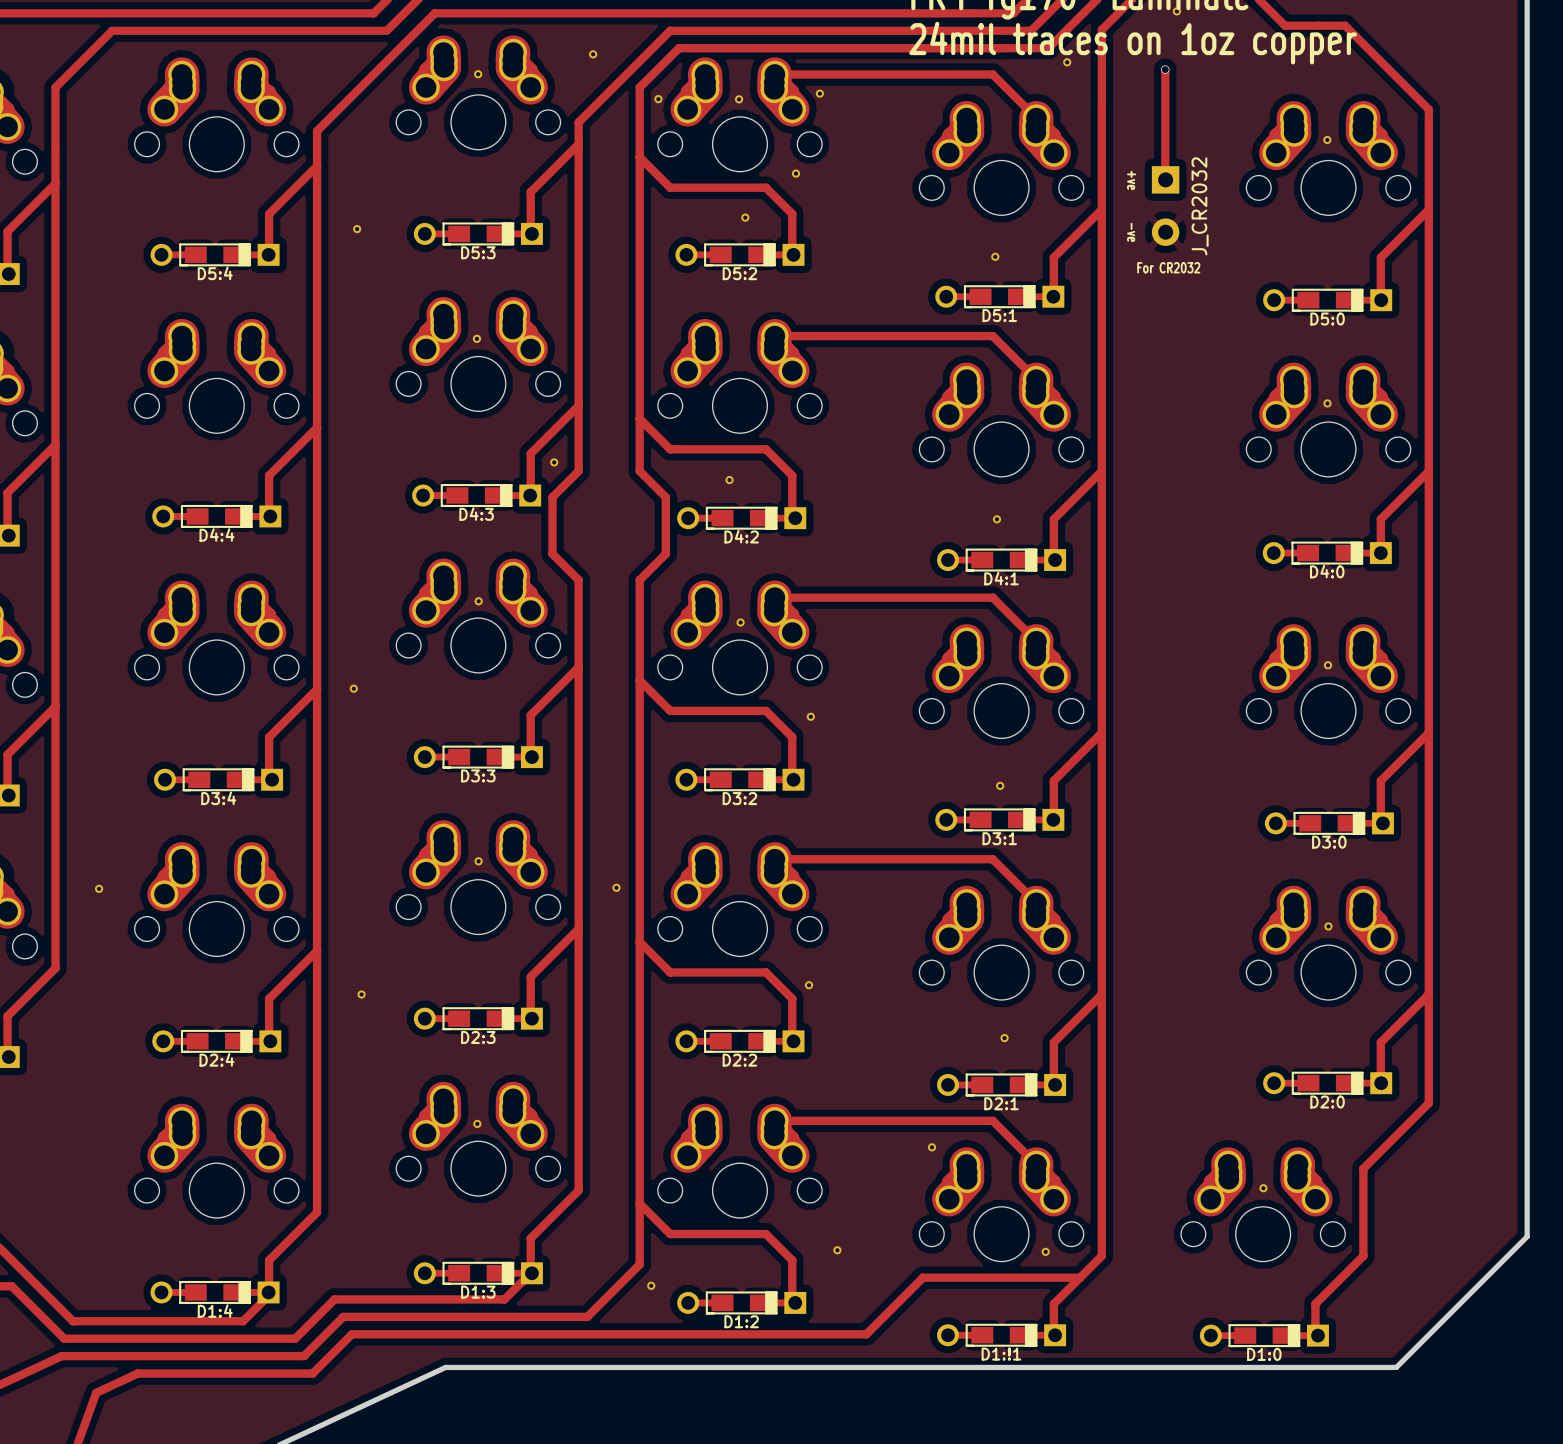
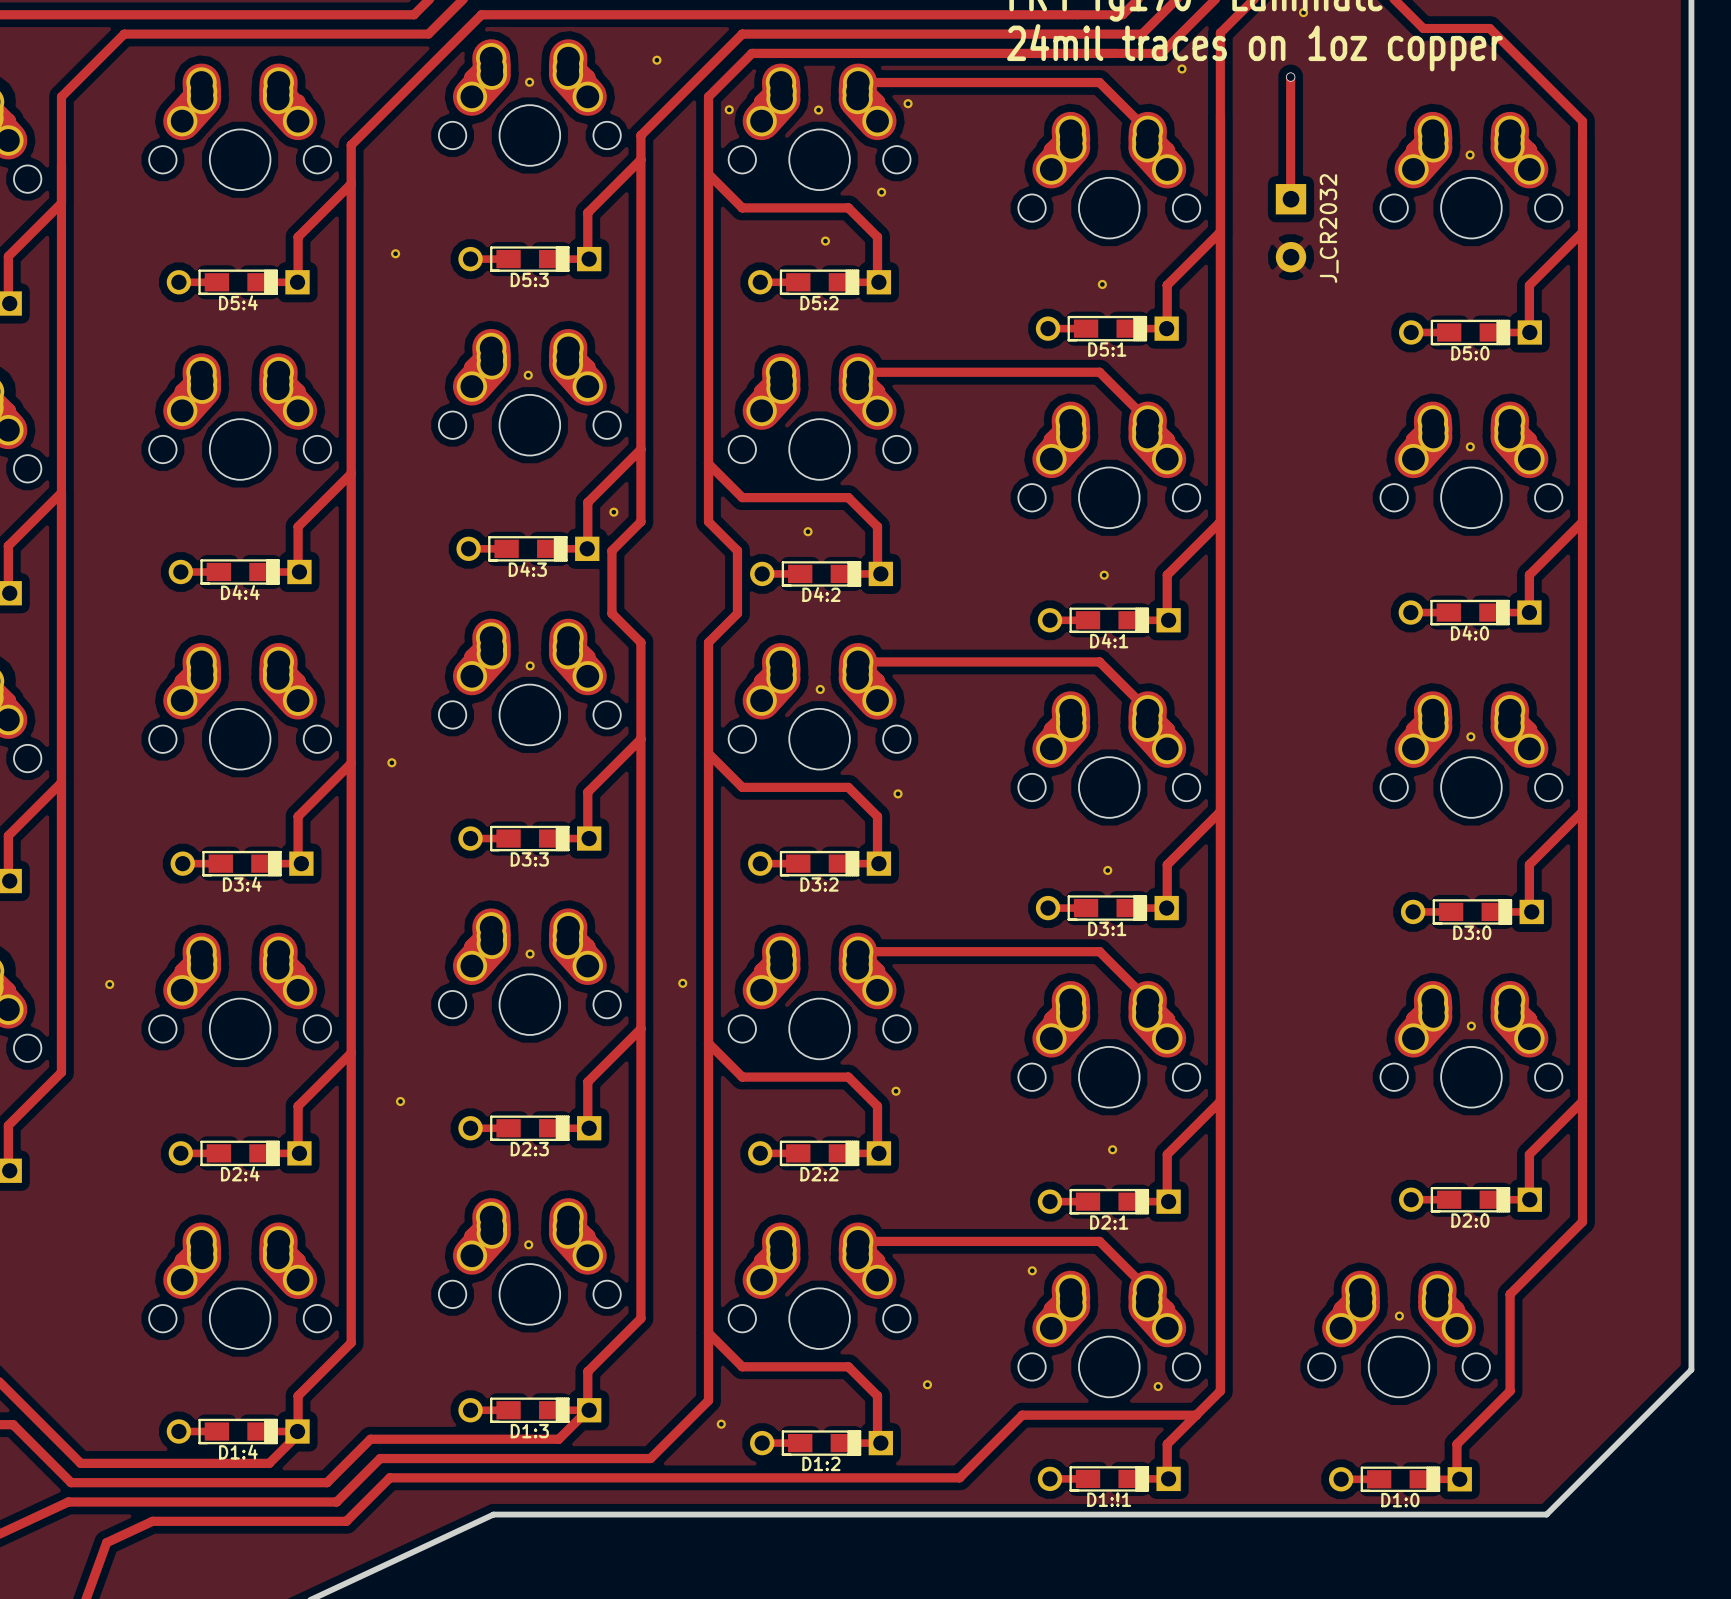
text: +ve (1131, 180) -> none
text: -ve (1131, 232) -> none
text: For CR2032 (1168, 267) -> none

